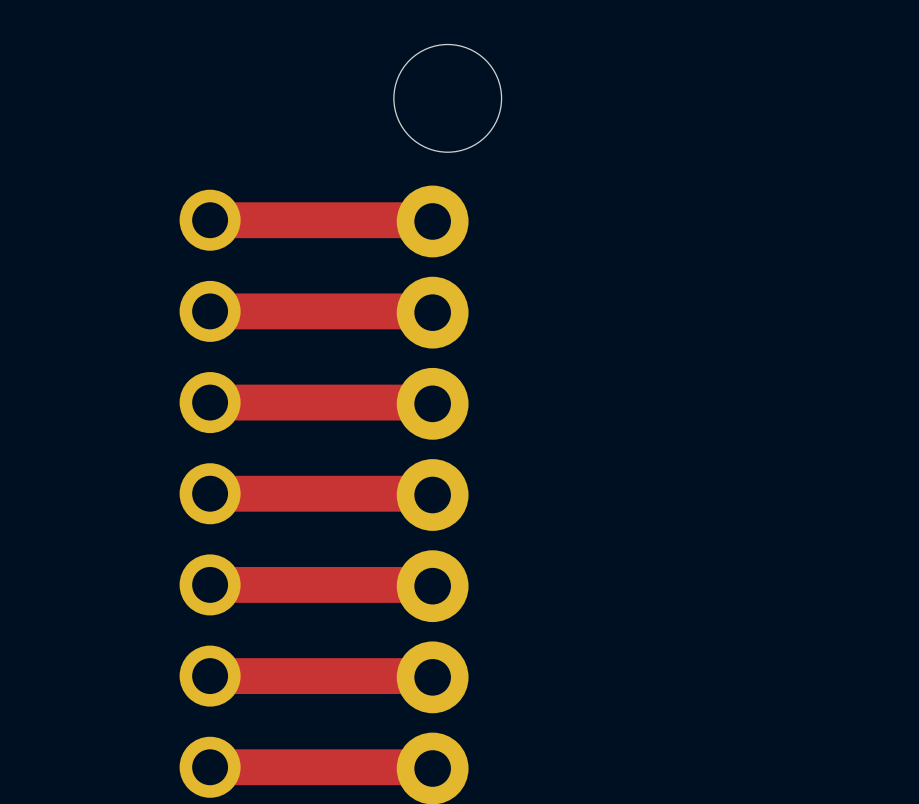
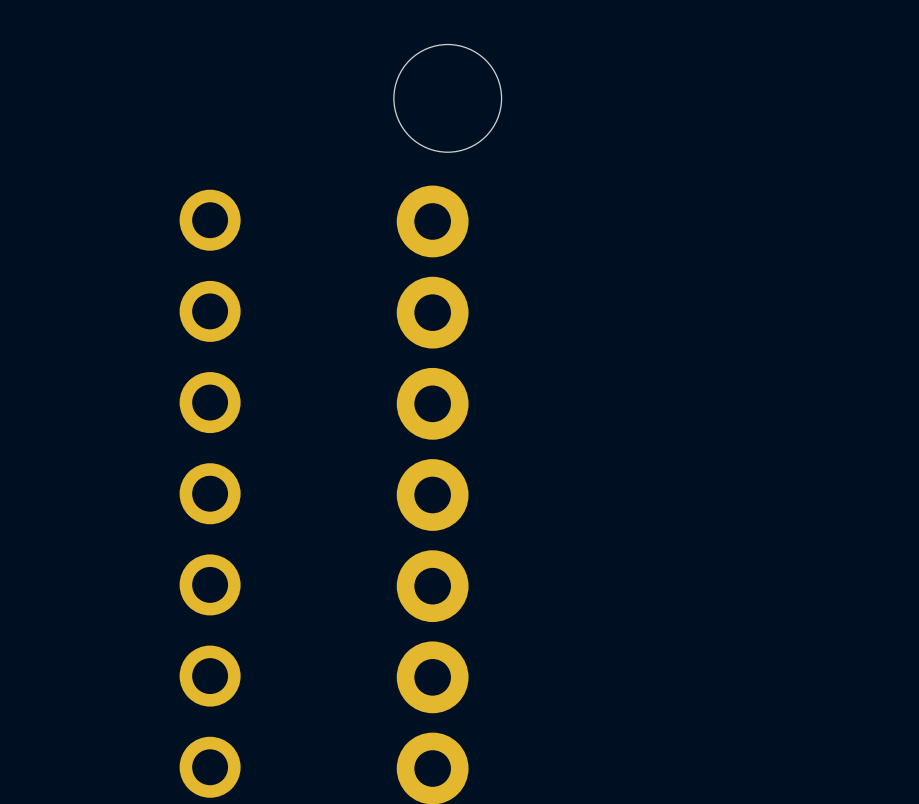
top track: (210, 220) (432, 221) -> none
top track: (210, 311) (432, 312) -> none
top track: (210, 402) (432, 403) -> none
top track: (210, 493) (432, 495) -> none
top track: (210, 584) (432, 586) -> none
top track: (210, 676) (432, 677) -> none
top track: (210, 767) (432, 768) -> none

